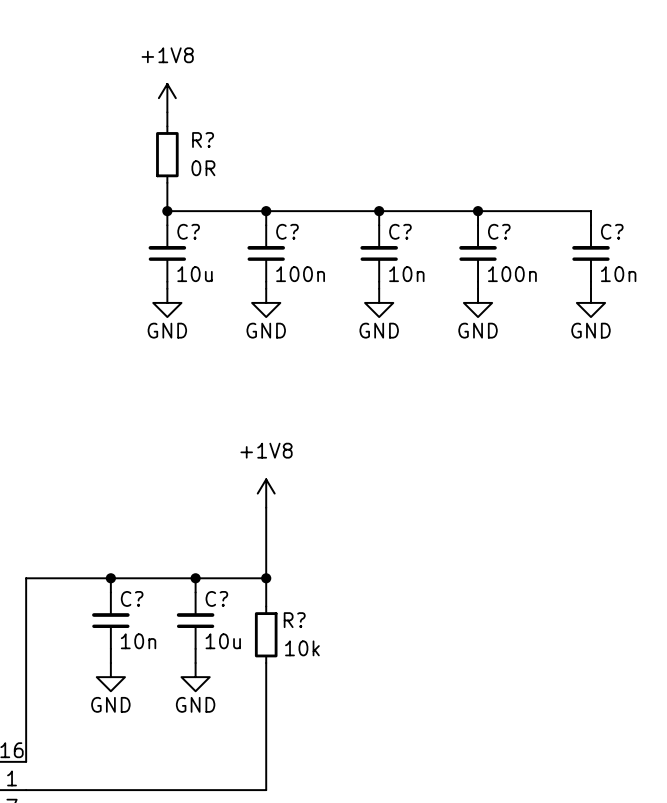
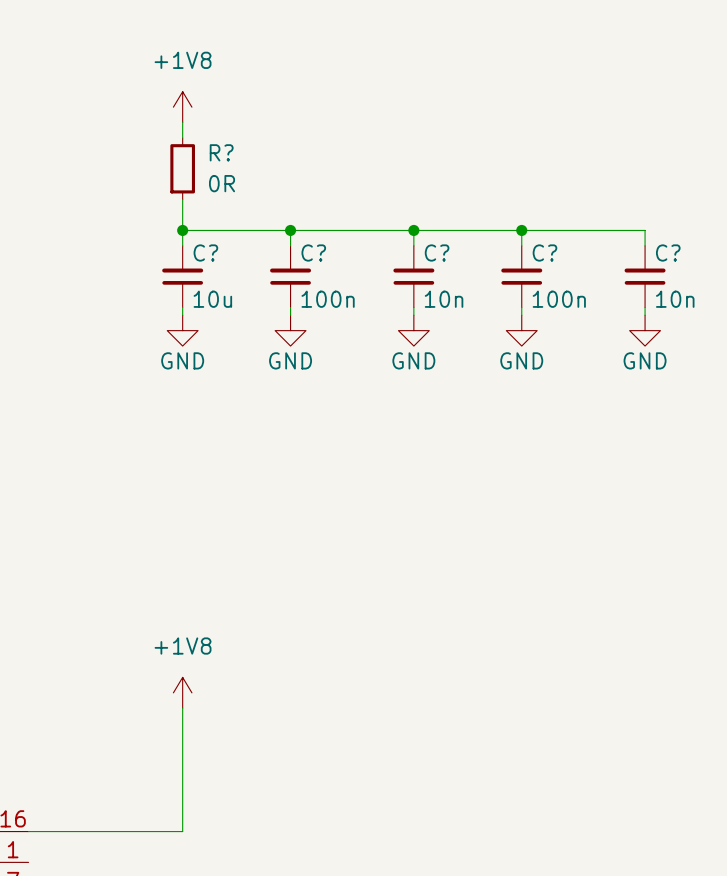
power symbol position: +1V8 (266, 493) -> +1V8 (182, 692)
wire: (266, 507) (266, 606) -> none
wire: (110, 578) (110, 592) -> none
junction: (110, 578) -> none
wire: (195, 578) (195, 592) -> none
junction: (195, 578) -> none
wire: (266, 578) (26, 578) (26, 761) -> (182, 708) (182, 831) (28, 831)
junction: (266, 578) -> none
C?: (110, 620) -> none
C?: (195, 620) -> none
R?: (266, 634) -> none
wire: (110, 648) (110, 663) -> none
wire: (195, 648) (195, 663) -> none
wire: (266, 663) (266, 790) (26, 790) -> none
power symbol: GND (110, 677) -> none
power symbol: GND (195, 677) -> none

